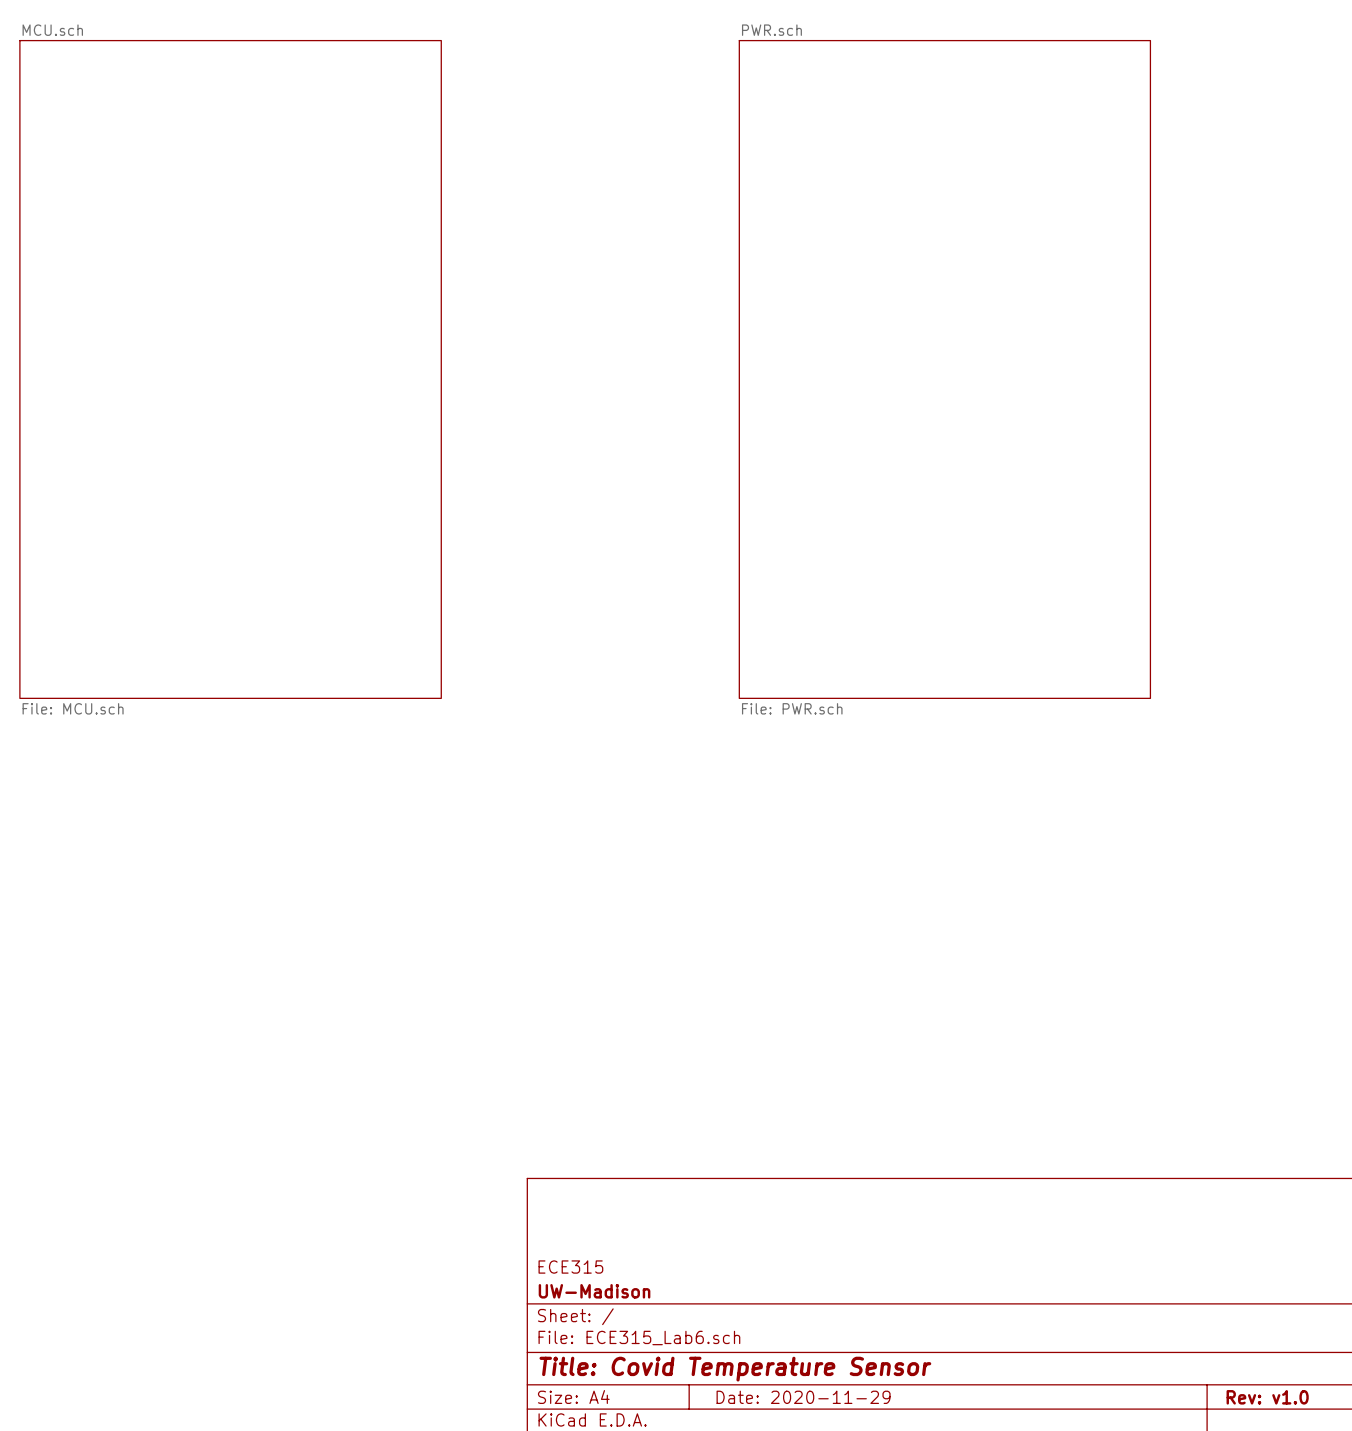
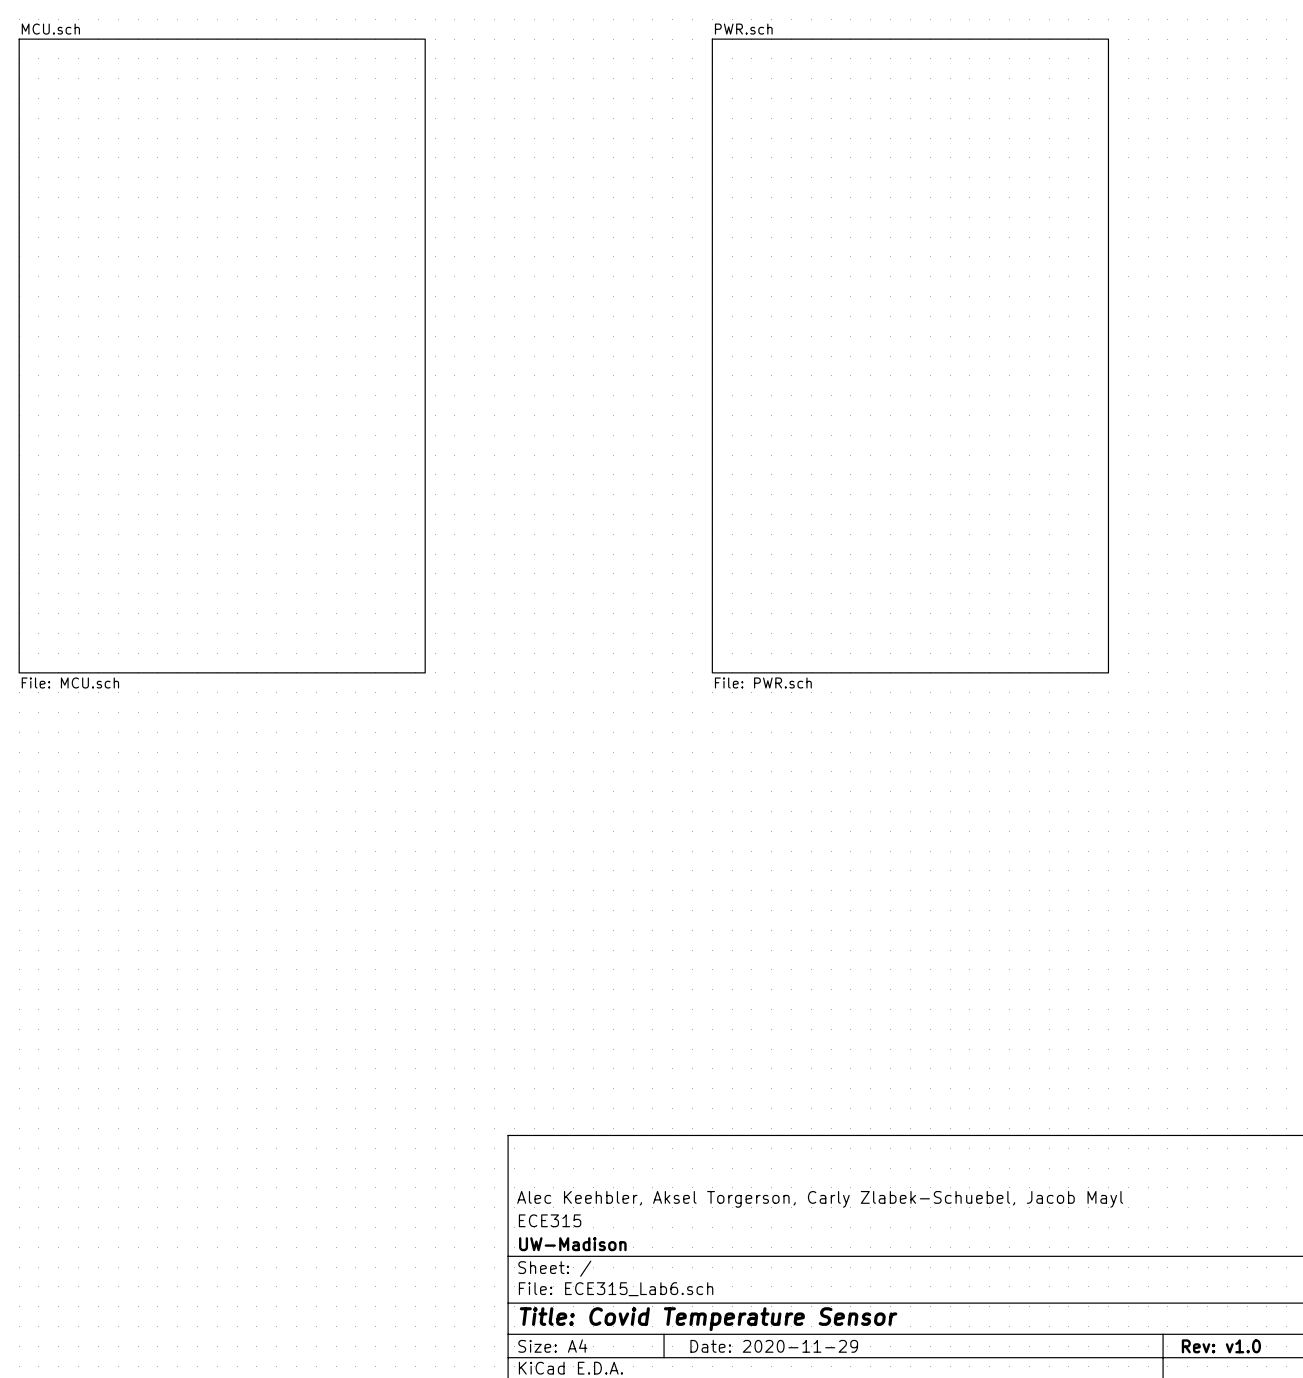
title block: none -> Alec Keehbler, Aksel Torgerson, Carly Zlabek-Schuebel, Jacob Mayl (820, 1199)

